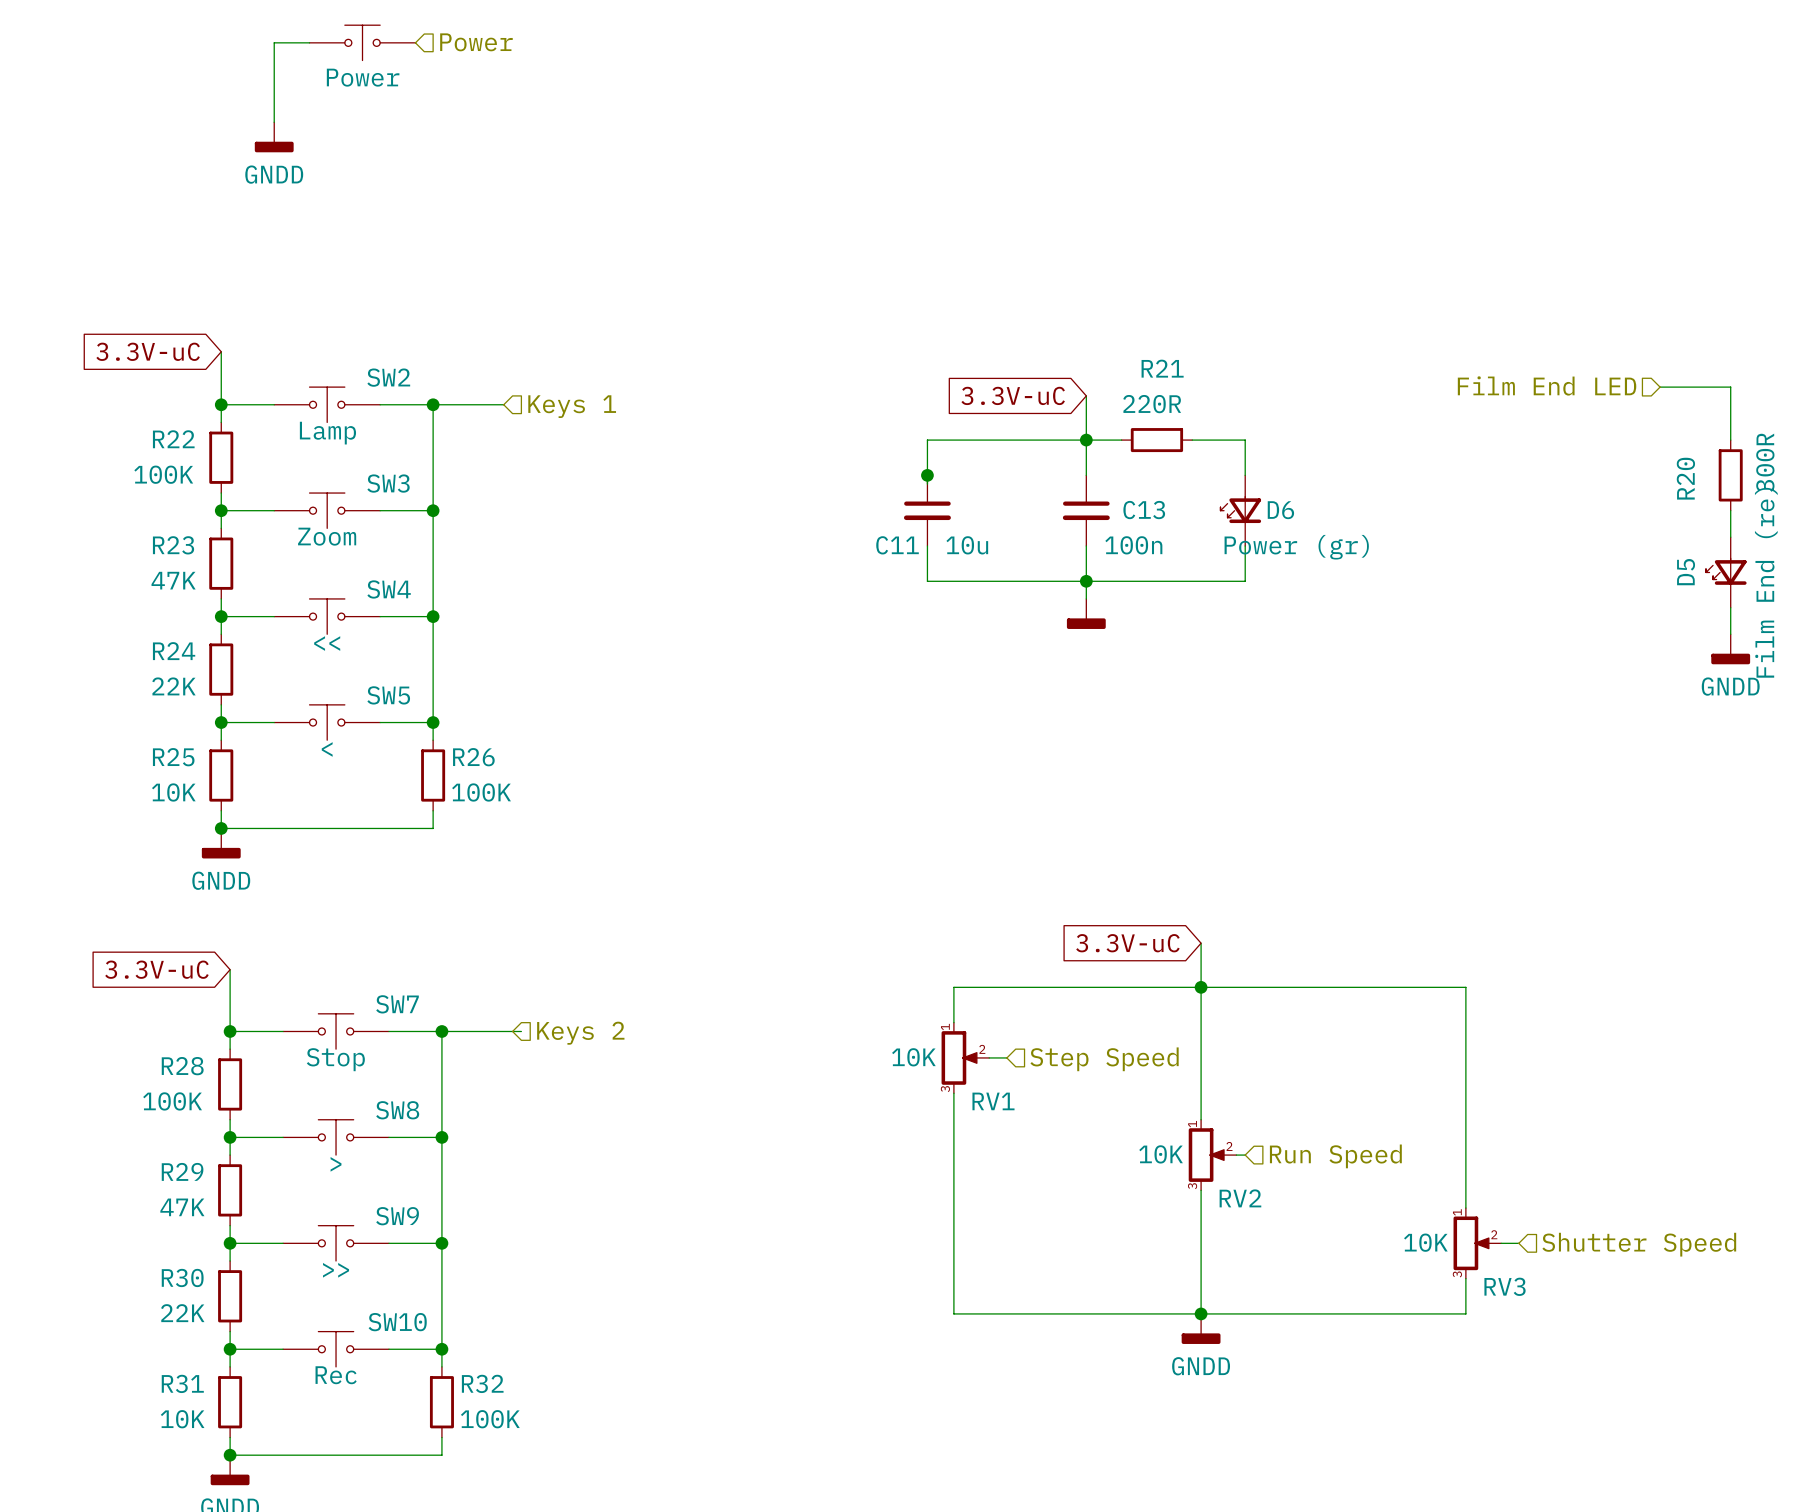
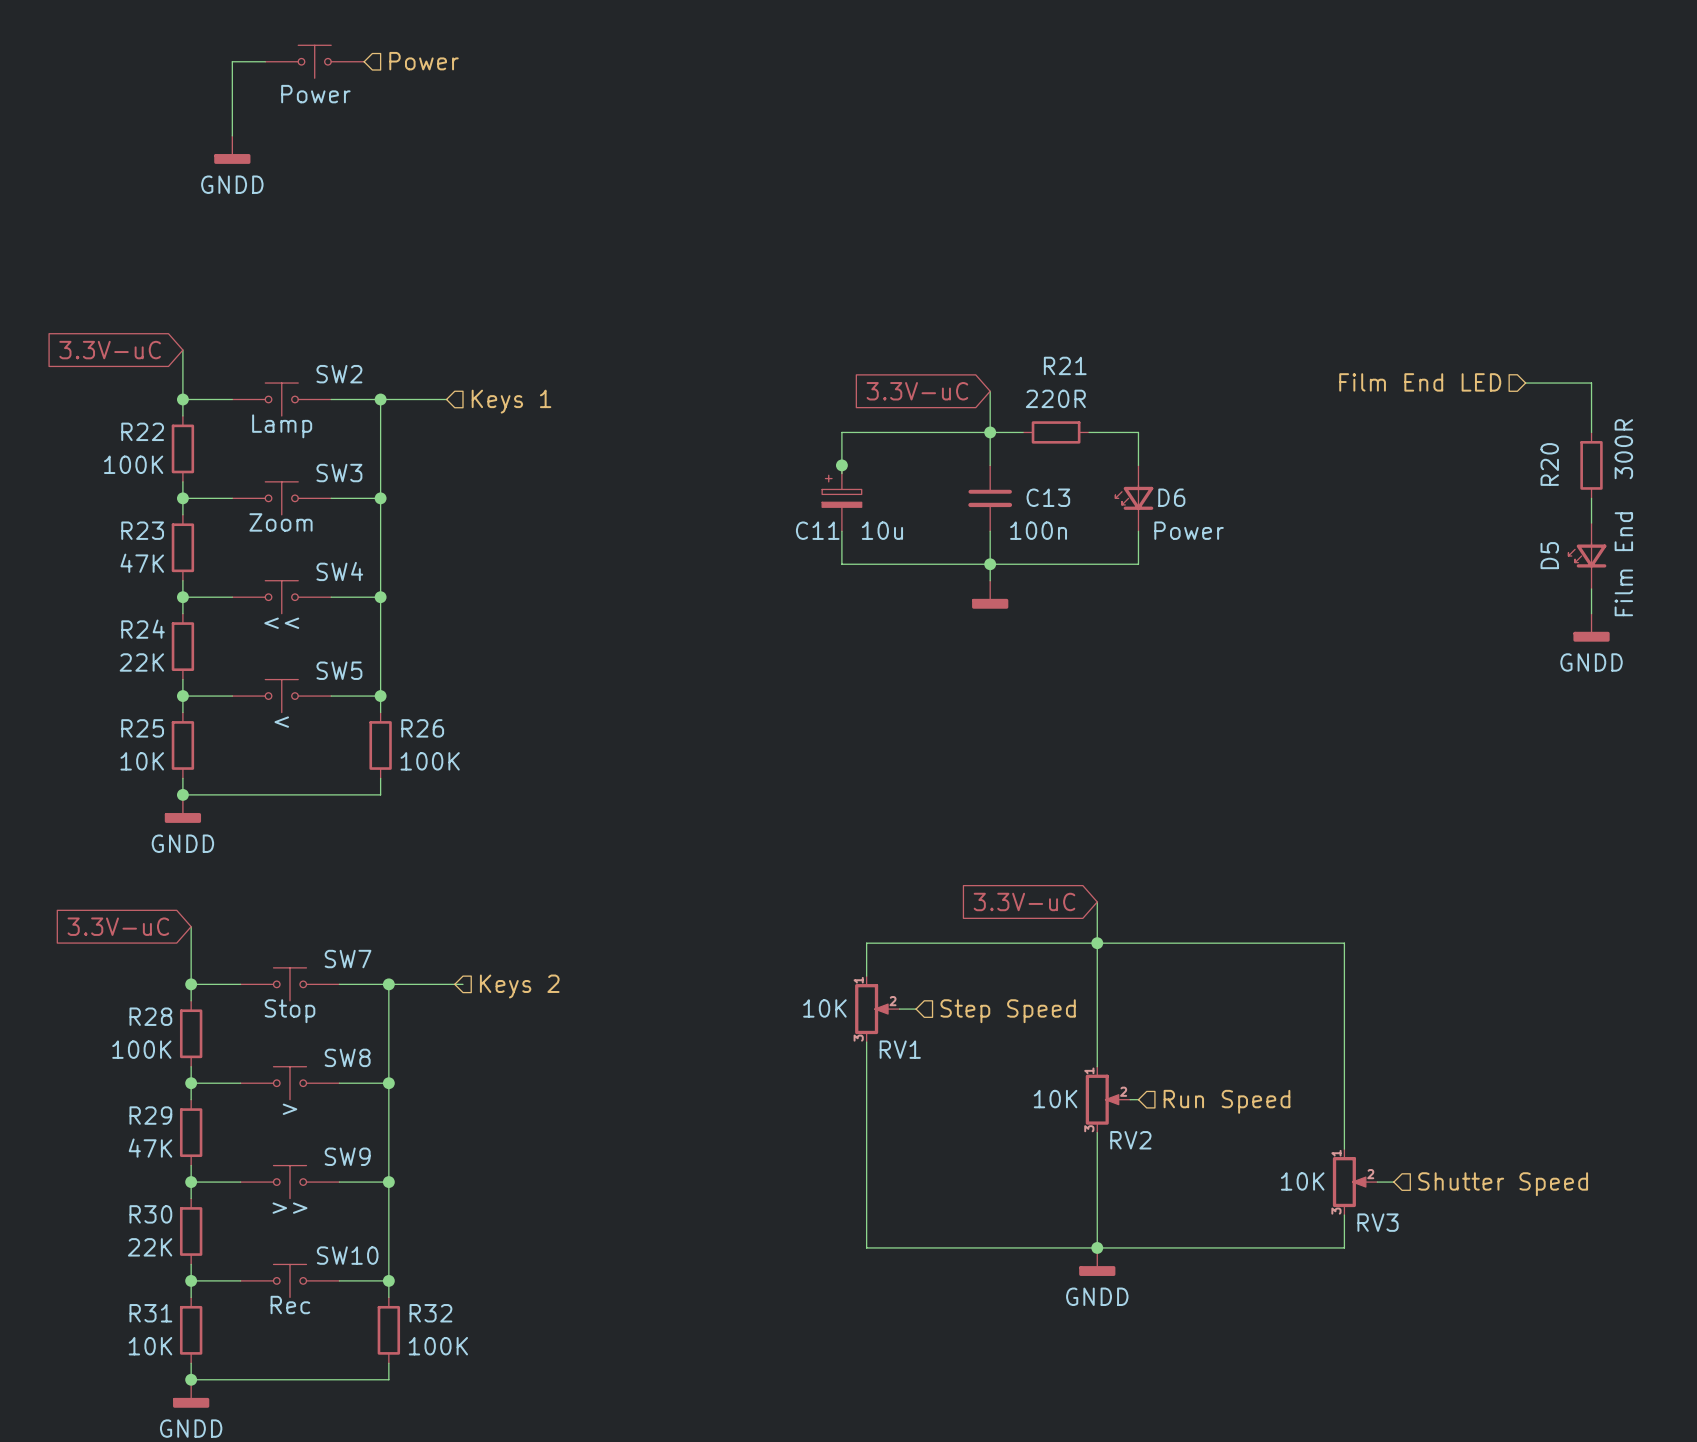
C11 symbol: [903, 475, 951, 546] -> [822, 465, 862, 532]
D6 value: Power (gr) (1296, 547) -> Power (1189, 530)
D5 value: Film End (re) (1766, 582) -> Film End (1623, 564)

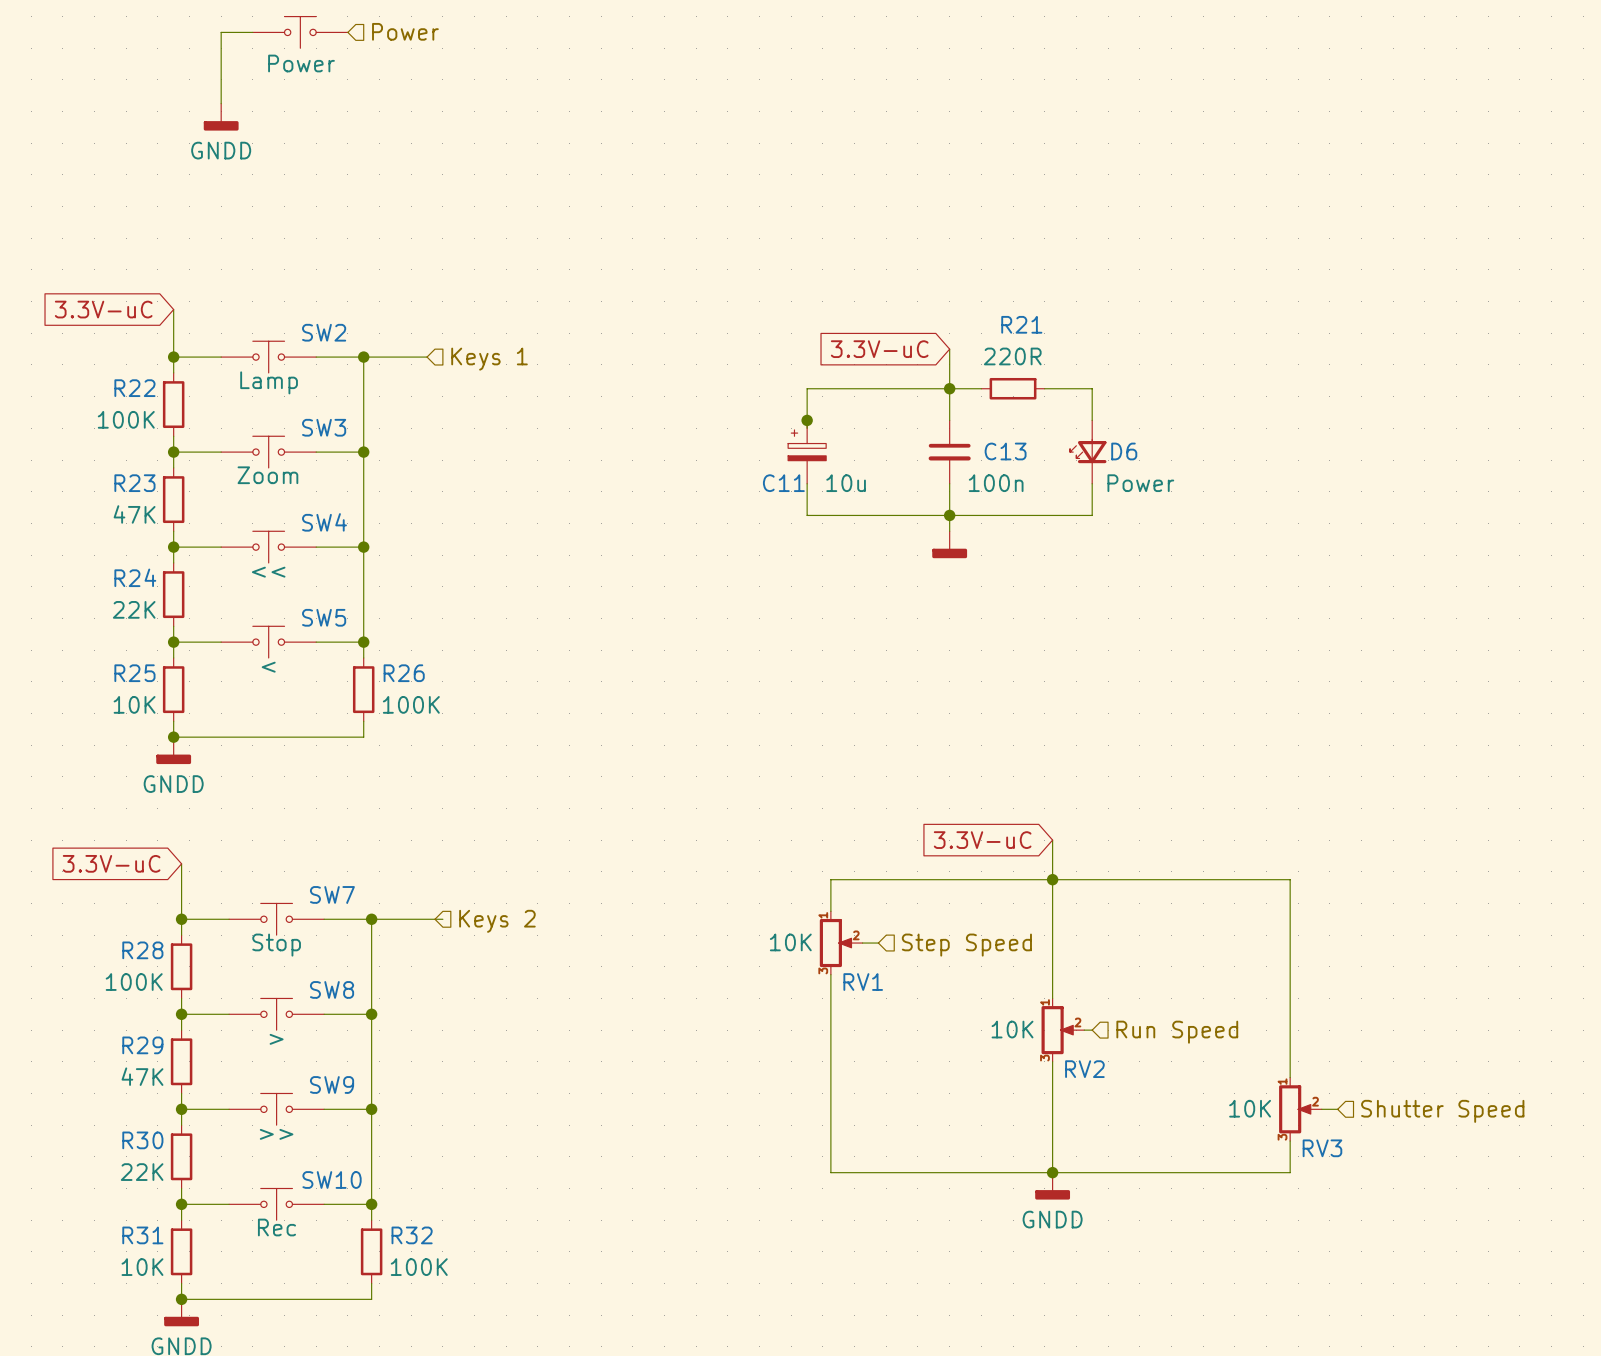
hierarchical label: Film End LED (1420, 382) -> none
wire: (1525, 383) (1591, 383) (1591, 432) -> none
R20: 300R (1591, 465) -> none
wire: (1591, 498) (1591, 523) -> none
D5: Film End (1587, 556) -> none
wire: (1591, 588) (1591, 613) -> none
power symbol: GNDD (1591, 627) -> none

